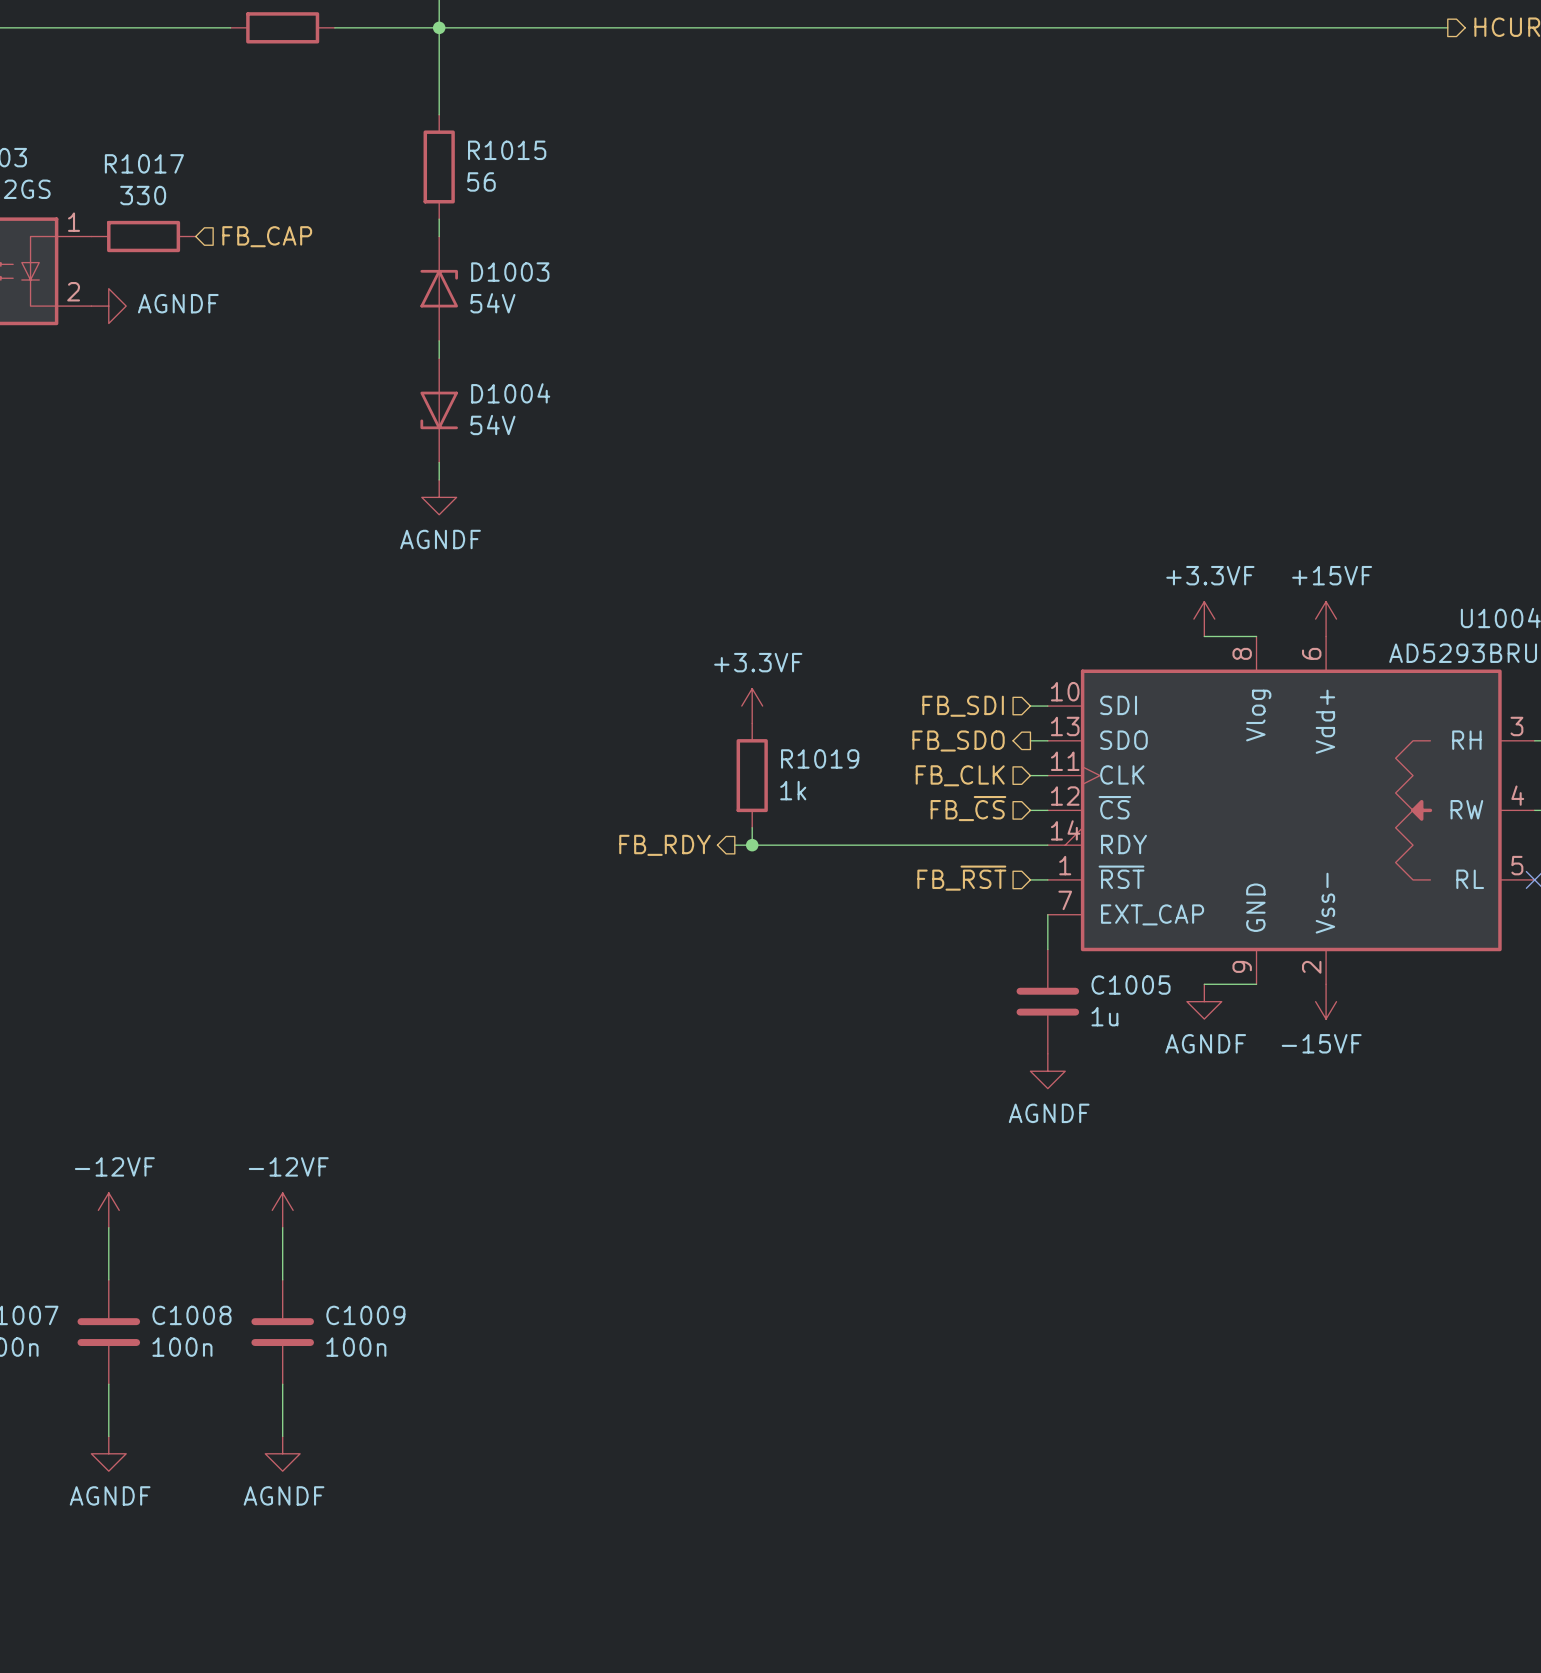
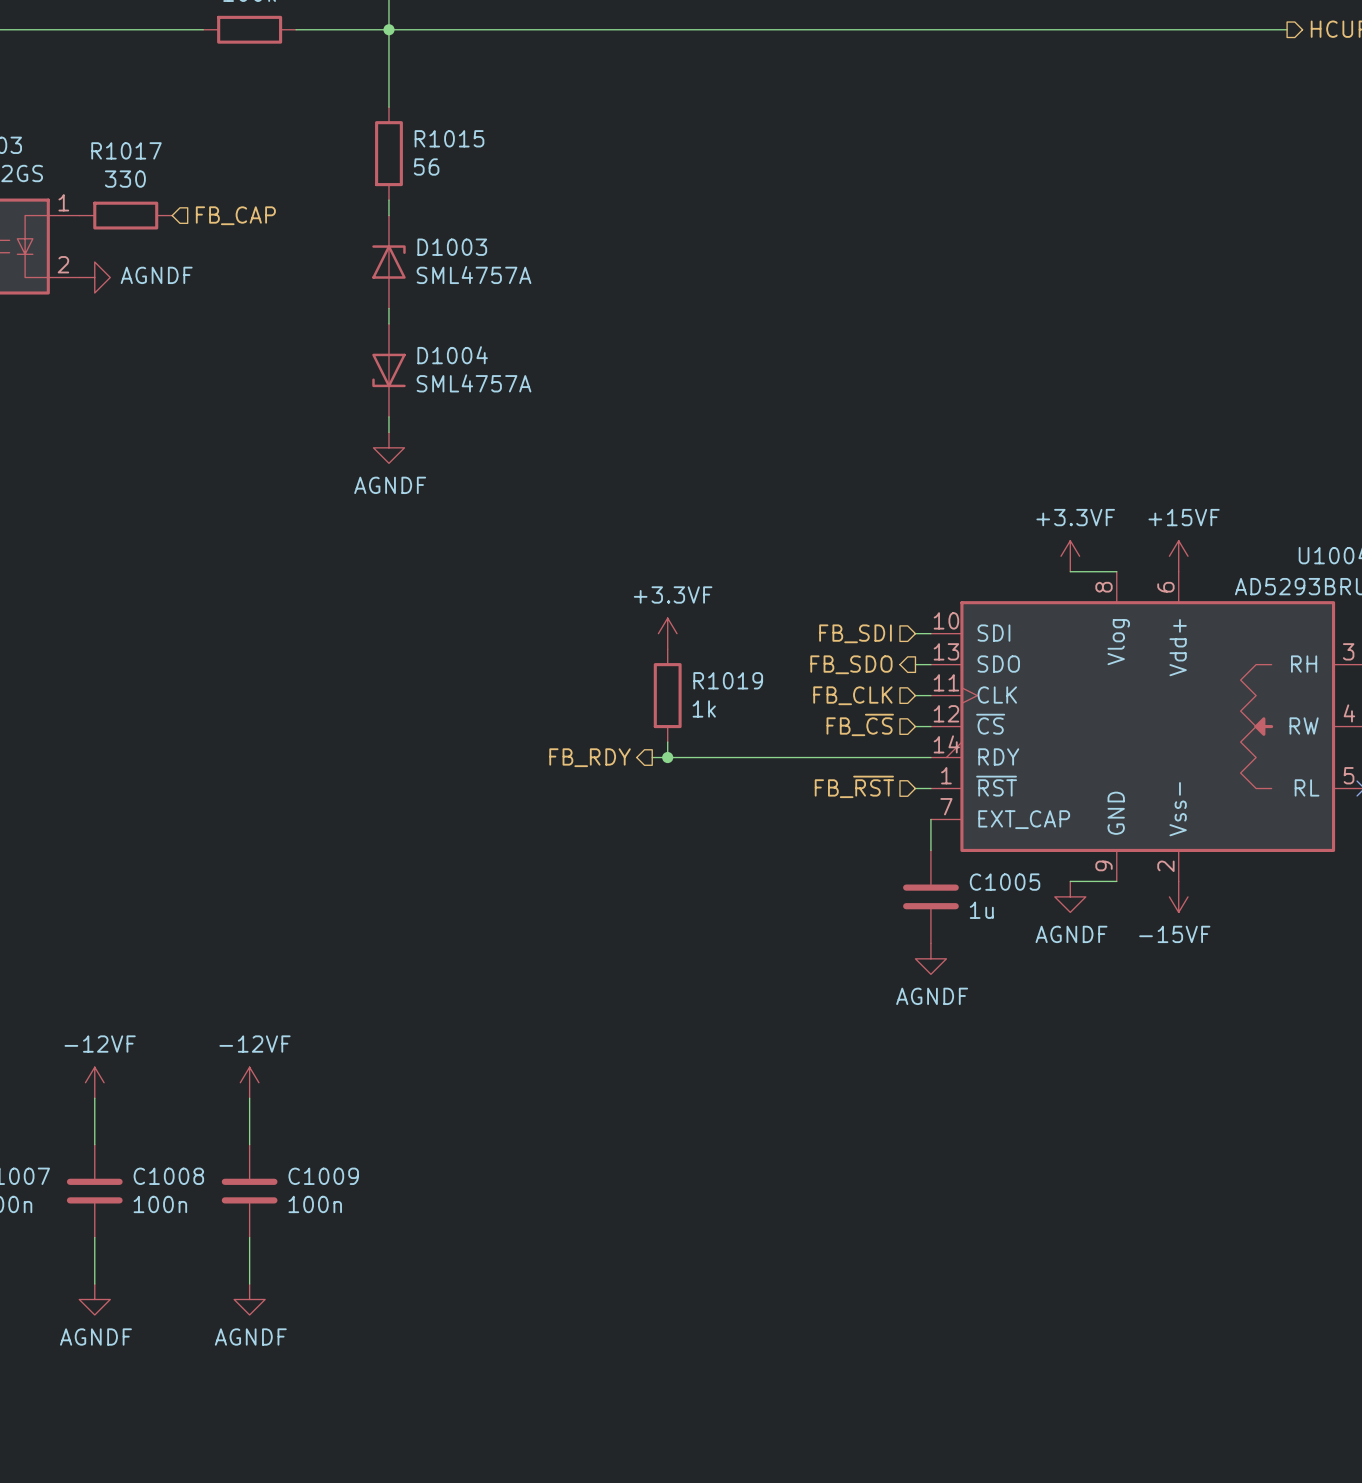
D1003 value: 54V (492, 303) -> SML4757A (474, 275)
D1004 value: 54V (492, 425) -> SML4757A (474, 383)

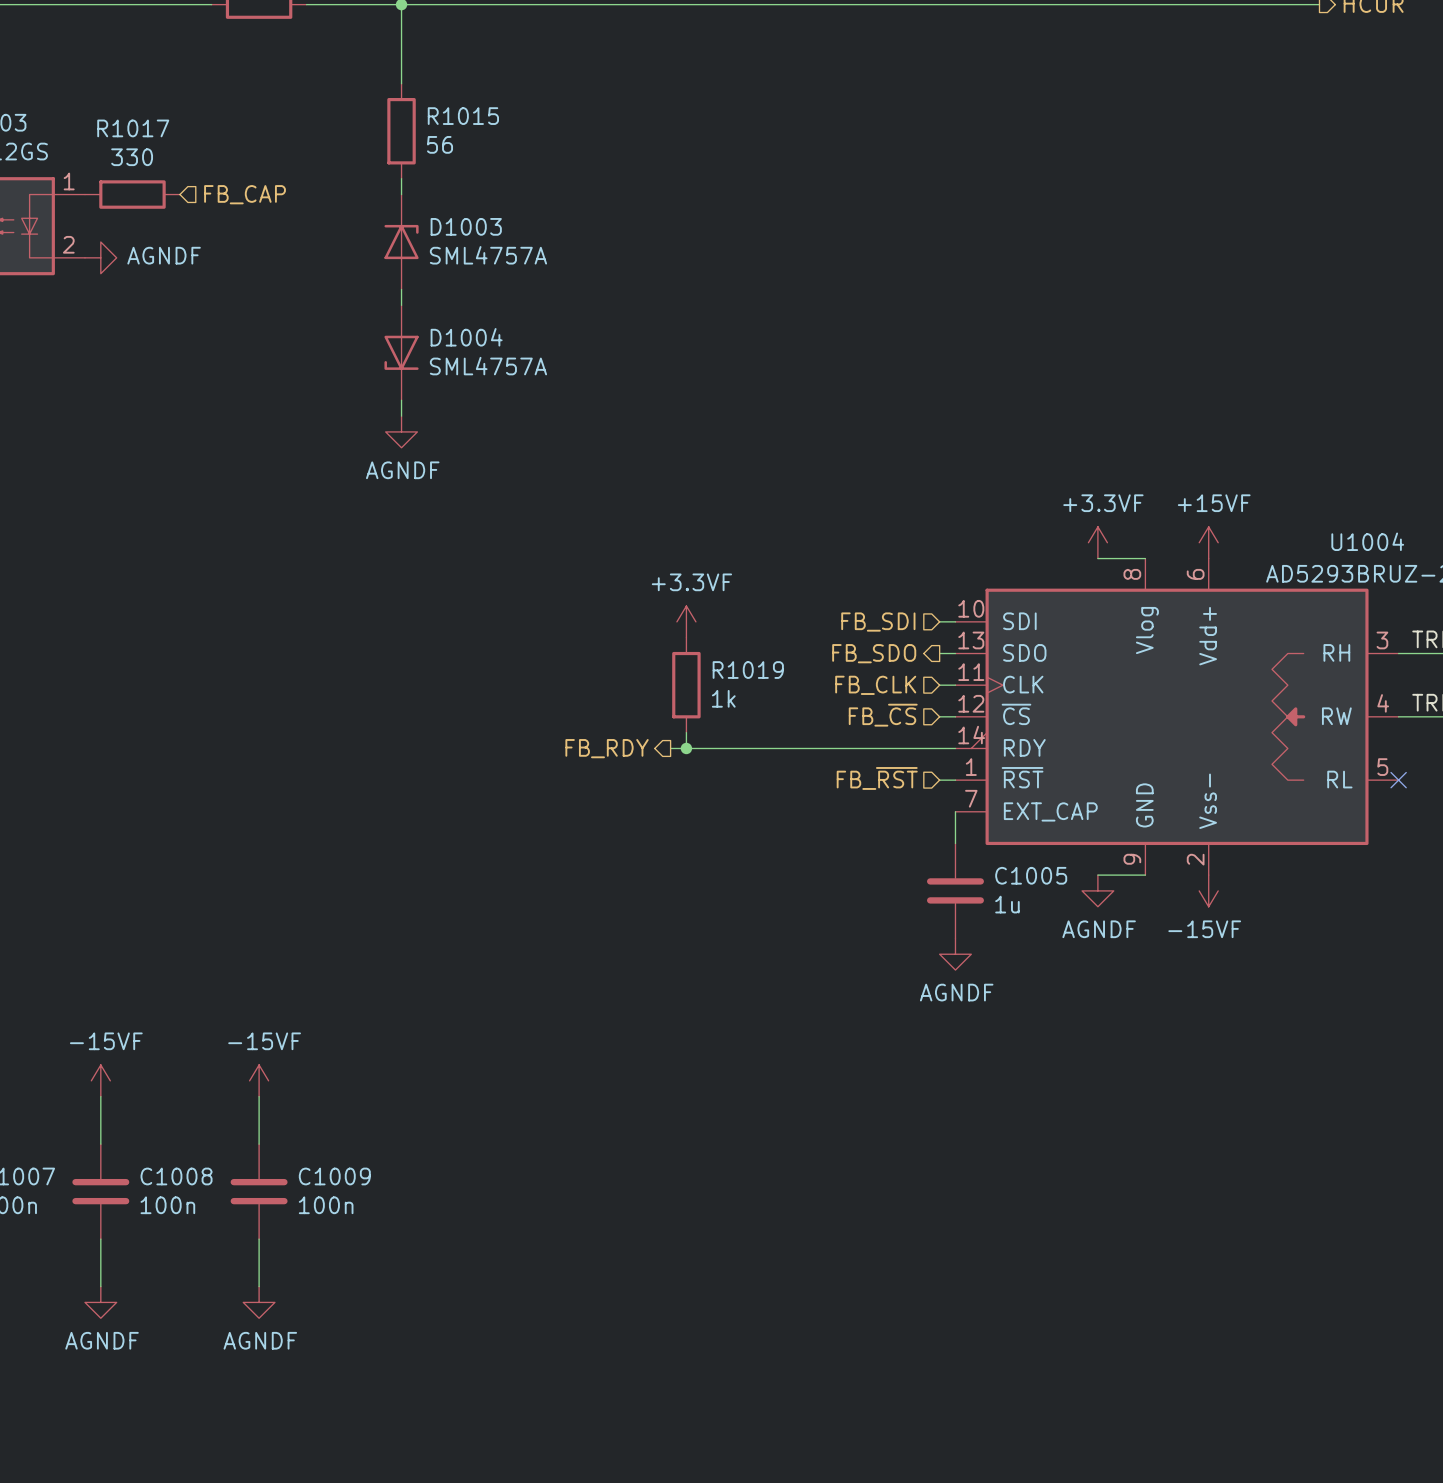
power symbol: -12VF (94, 1082) -> -15VF (100, 1080)
power symbol: -12VF (249, 1082) -> -15VF (259, 1080)

